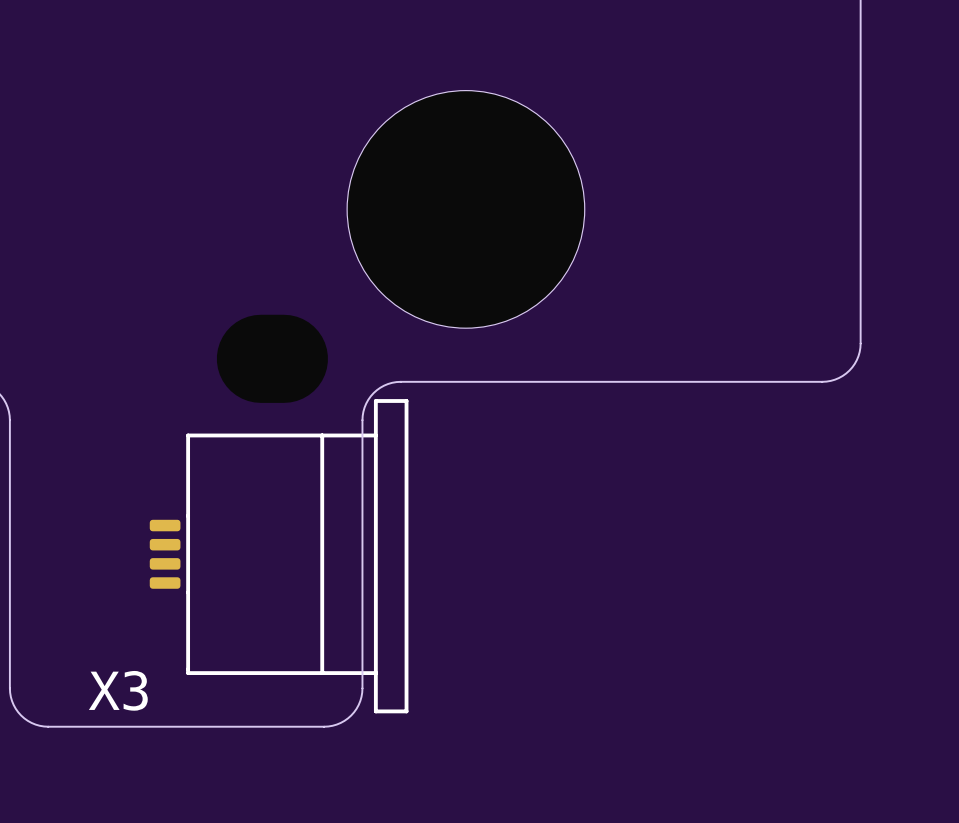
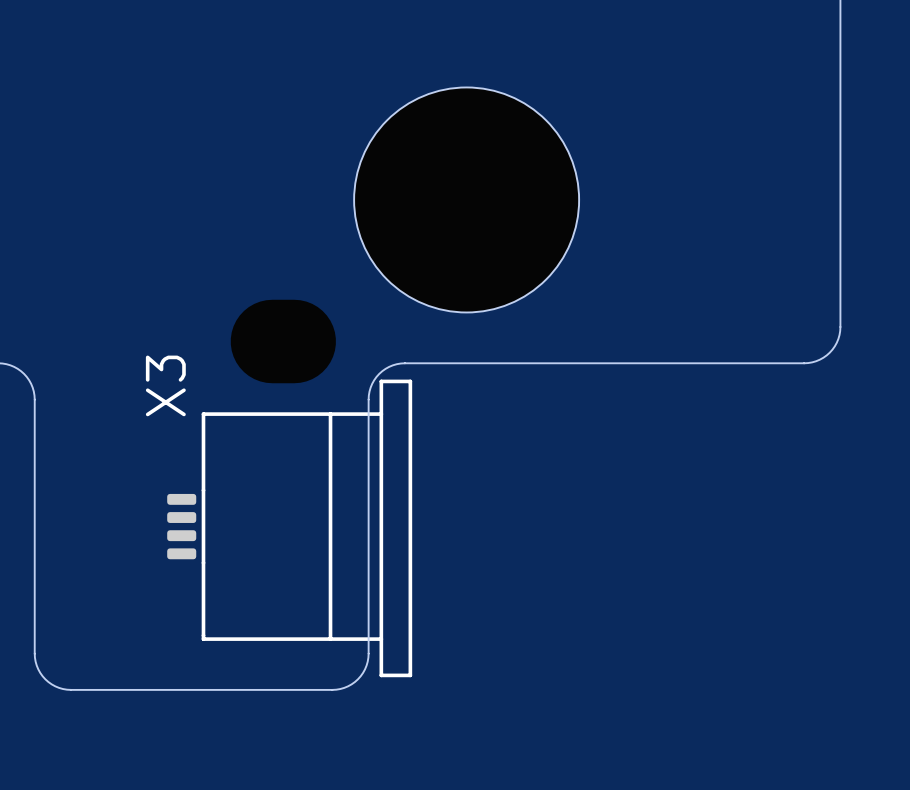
X3 name rotation: 0° (118, 690) -> 90° counterclockwise (165, 385)
X3 name position: X3 (118, 690) -> X3 (165, 385)

